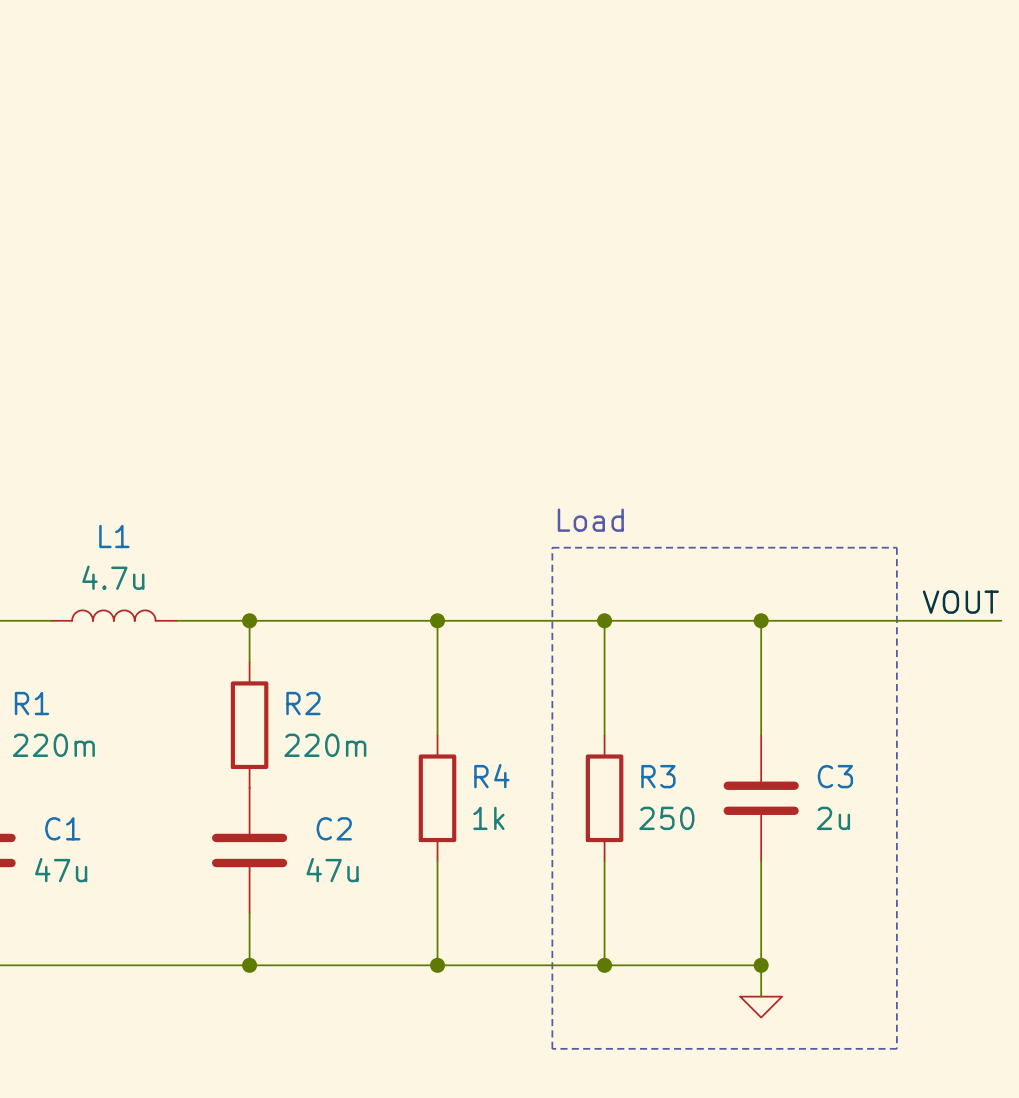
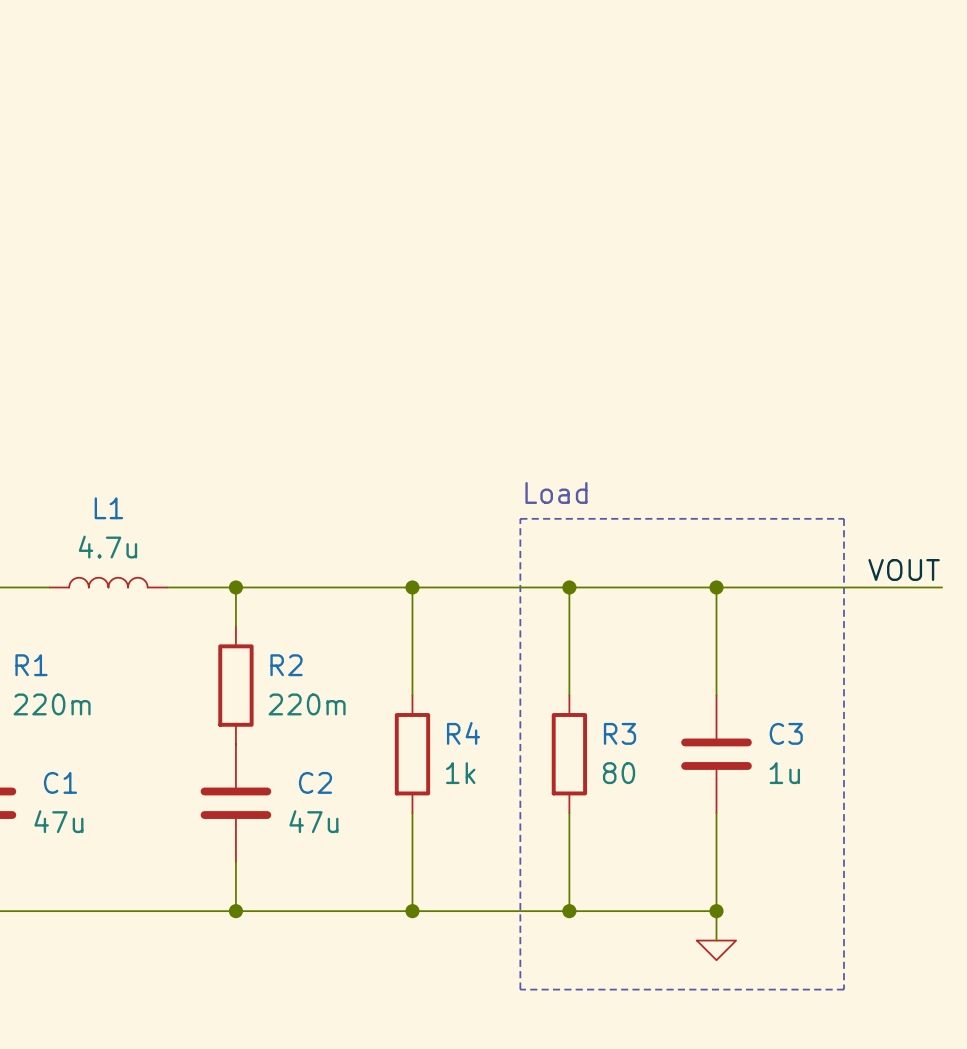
R3 value: 250 (666, 818) -> 80 (619, 773)
C3 value: 2u (833, 818) -> 1u (784, 773)

